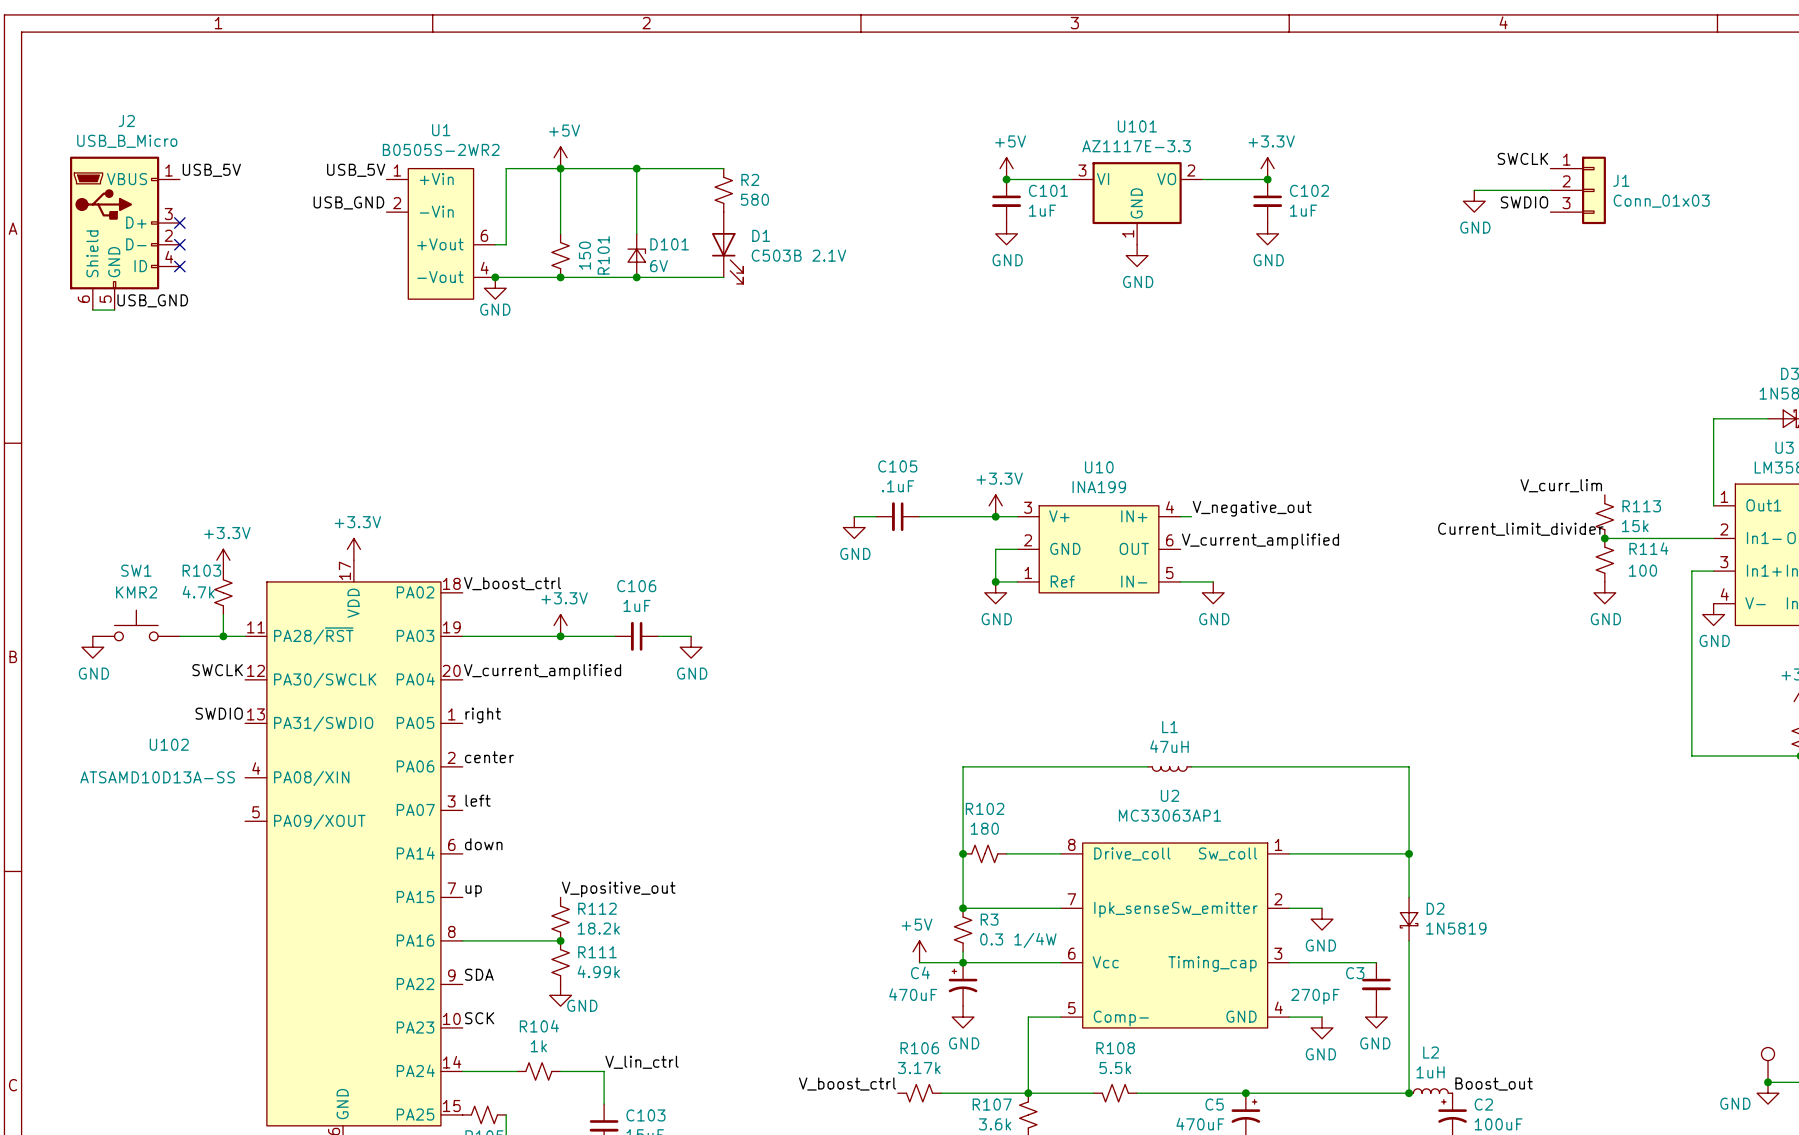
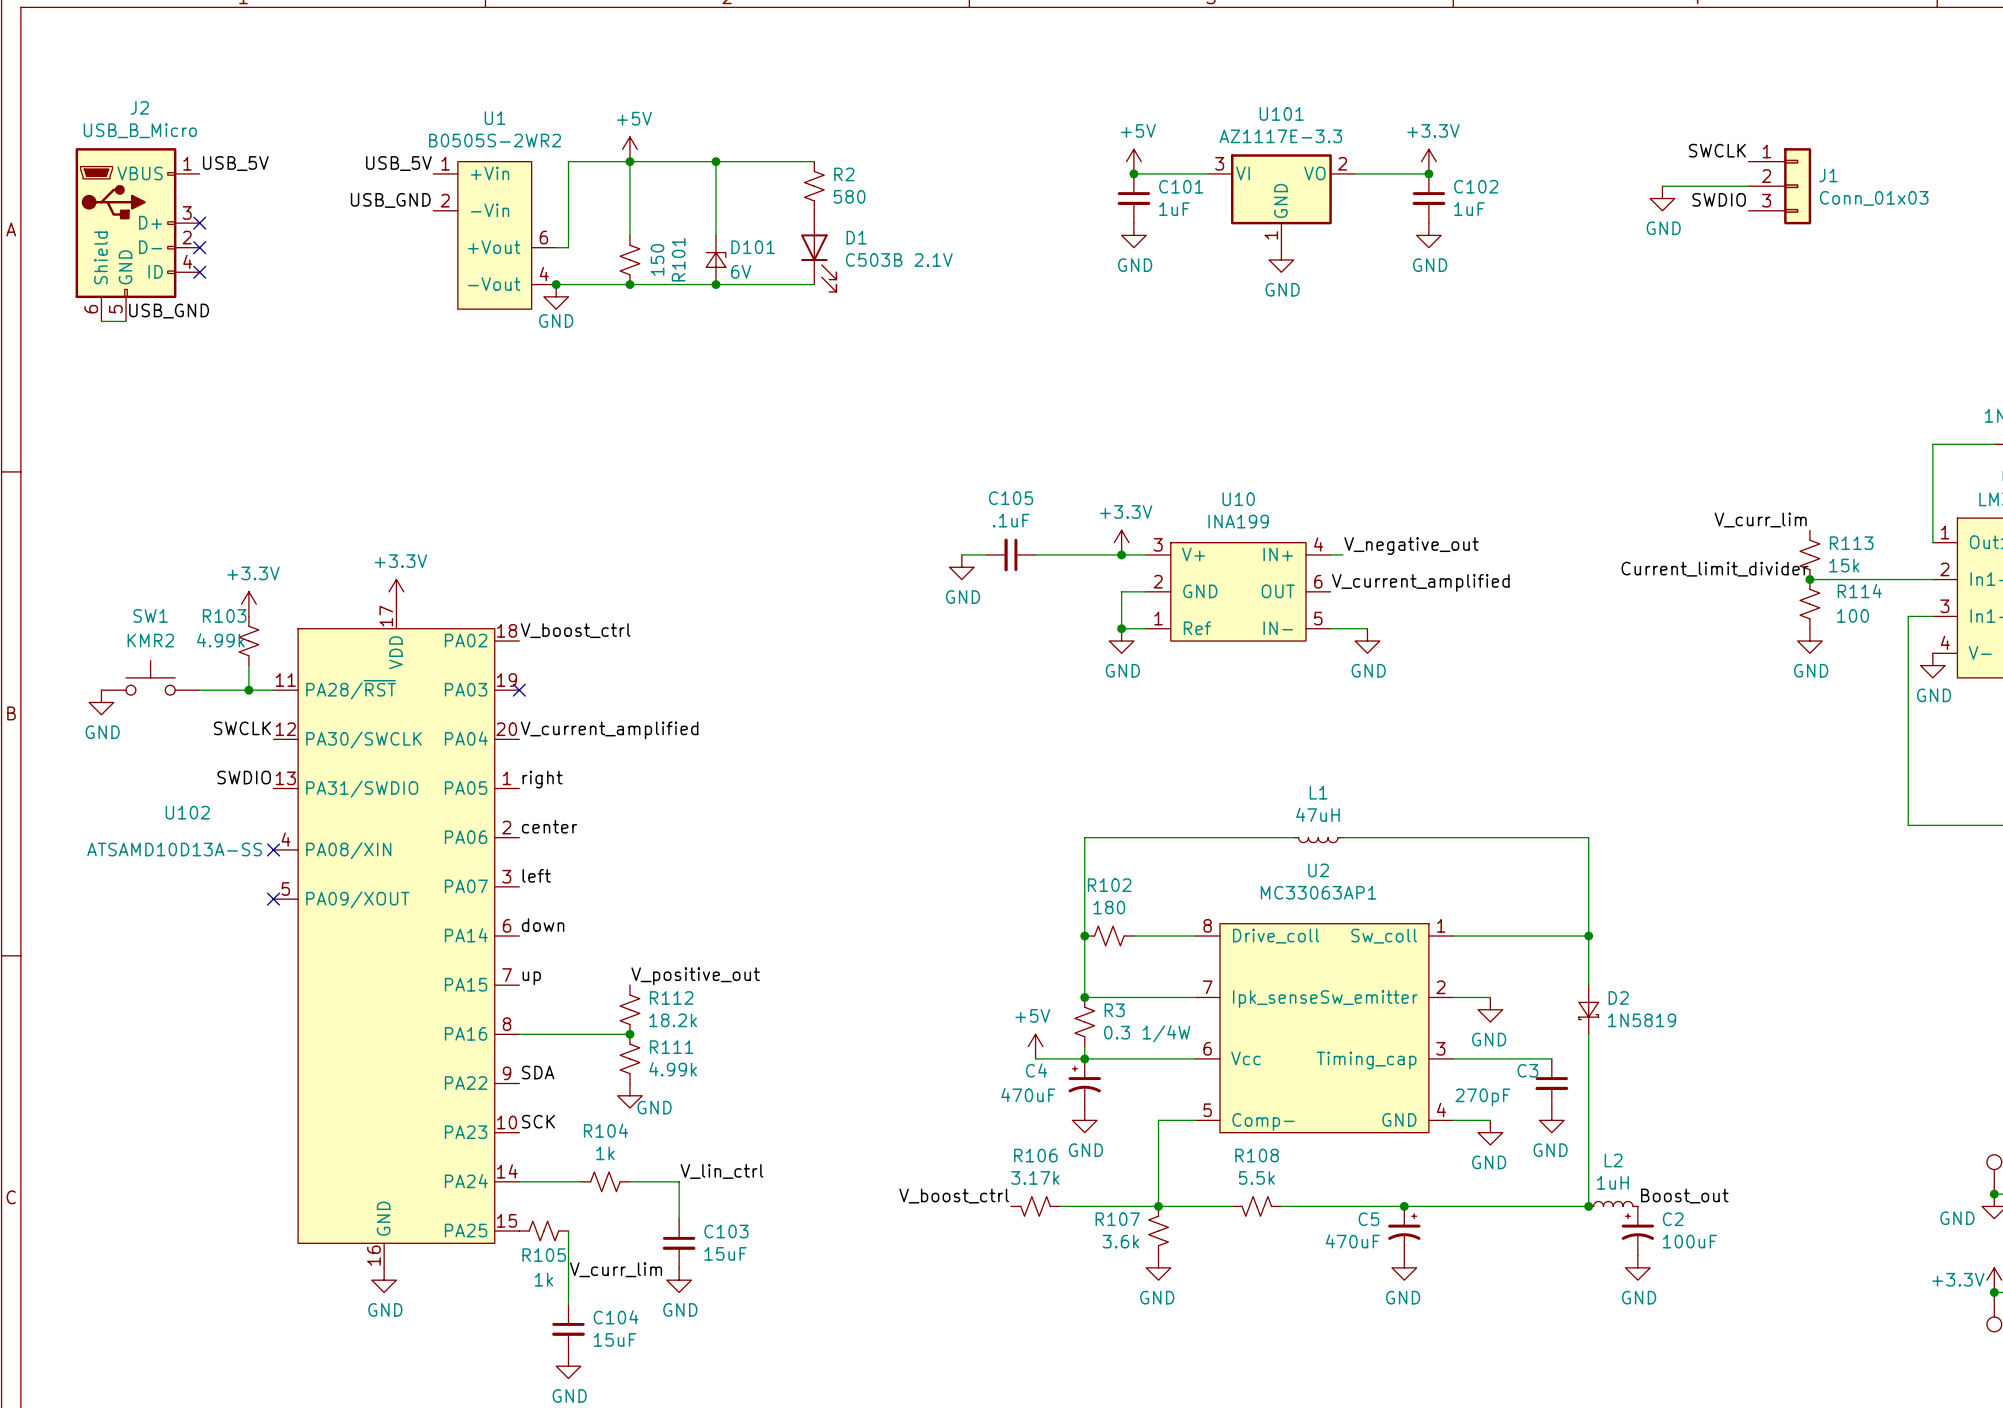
R103 value: 4.7k (198, 592) -> 4.99k (220, 640)
power symbol: +3.3V (560, 625) -> none
wire: (462, 636) (614, 636) -> none
no-connect mark: none -> (519, 690)
junction: (560, 636) -> none
C106: 1uF (636, 636) -> none
wire: (658, 636) (691, 636) -> none
power symbol: GND (691, 647) -> none
no-connect mark: none -> (273, 849)
no-connect mark: none -> (273, 899)

